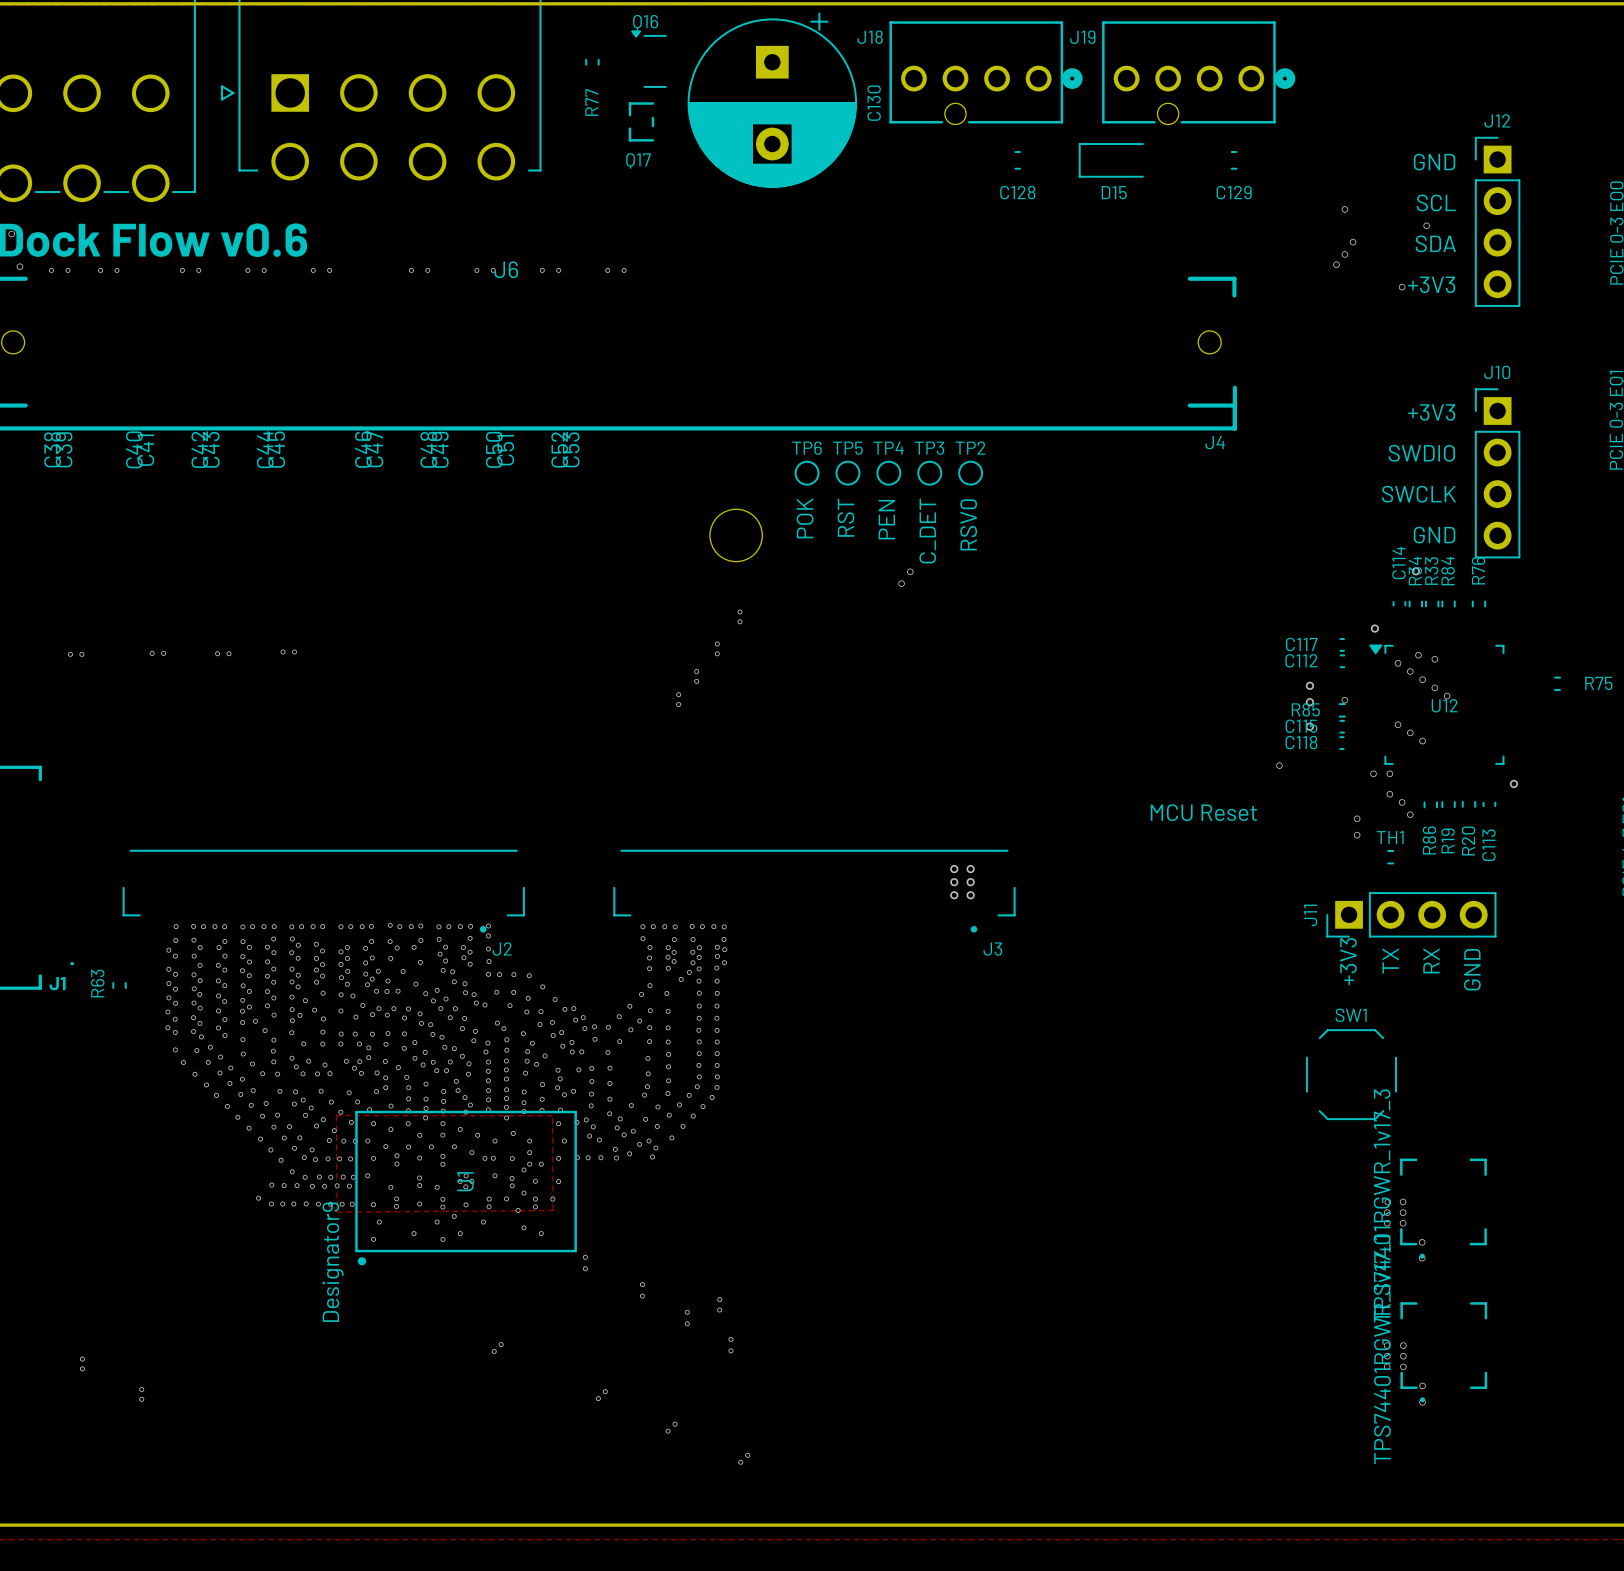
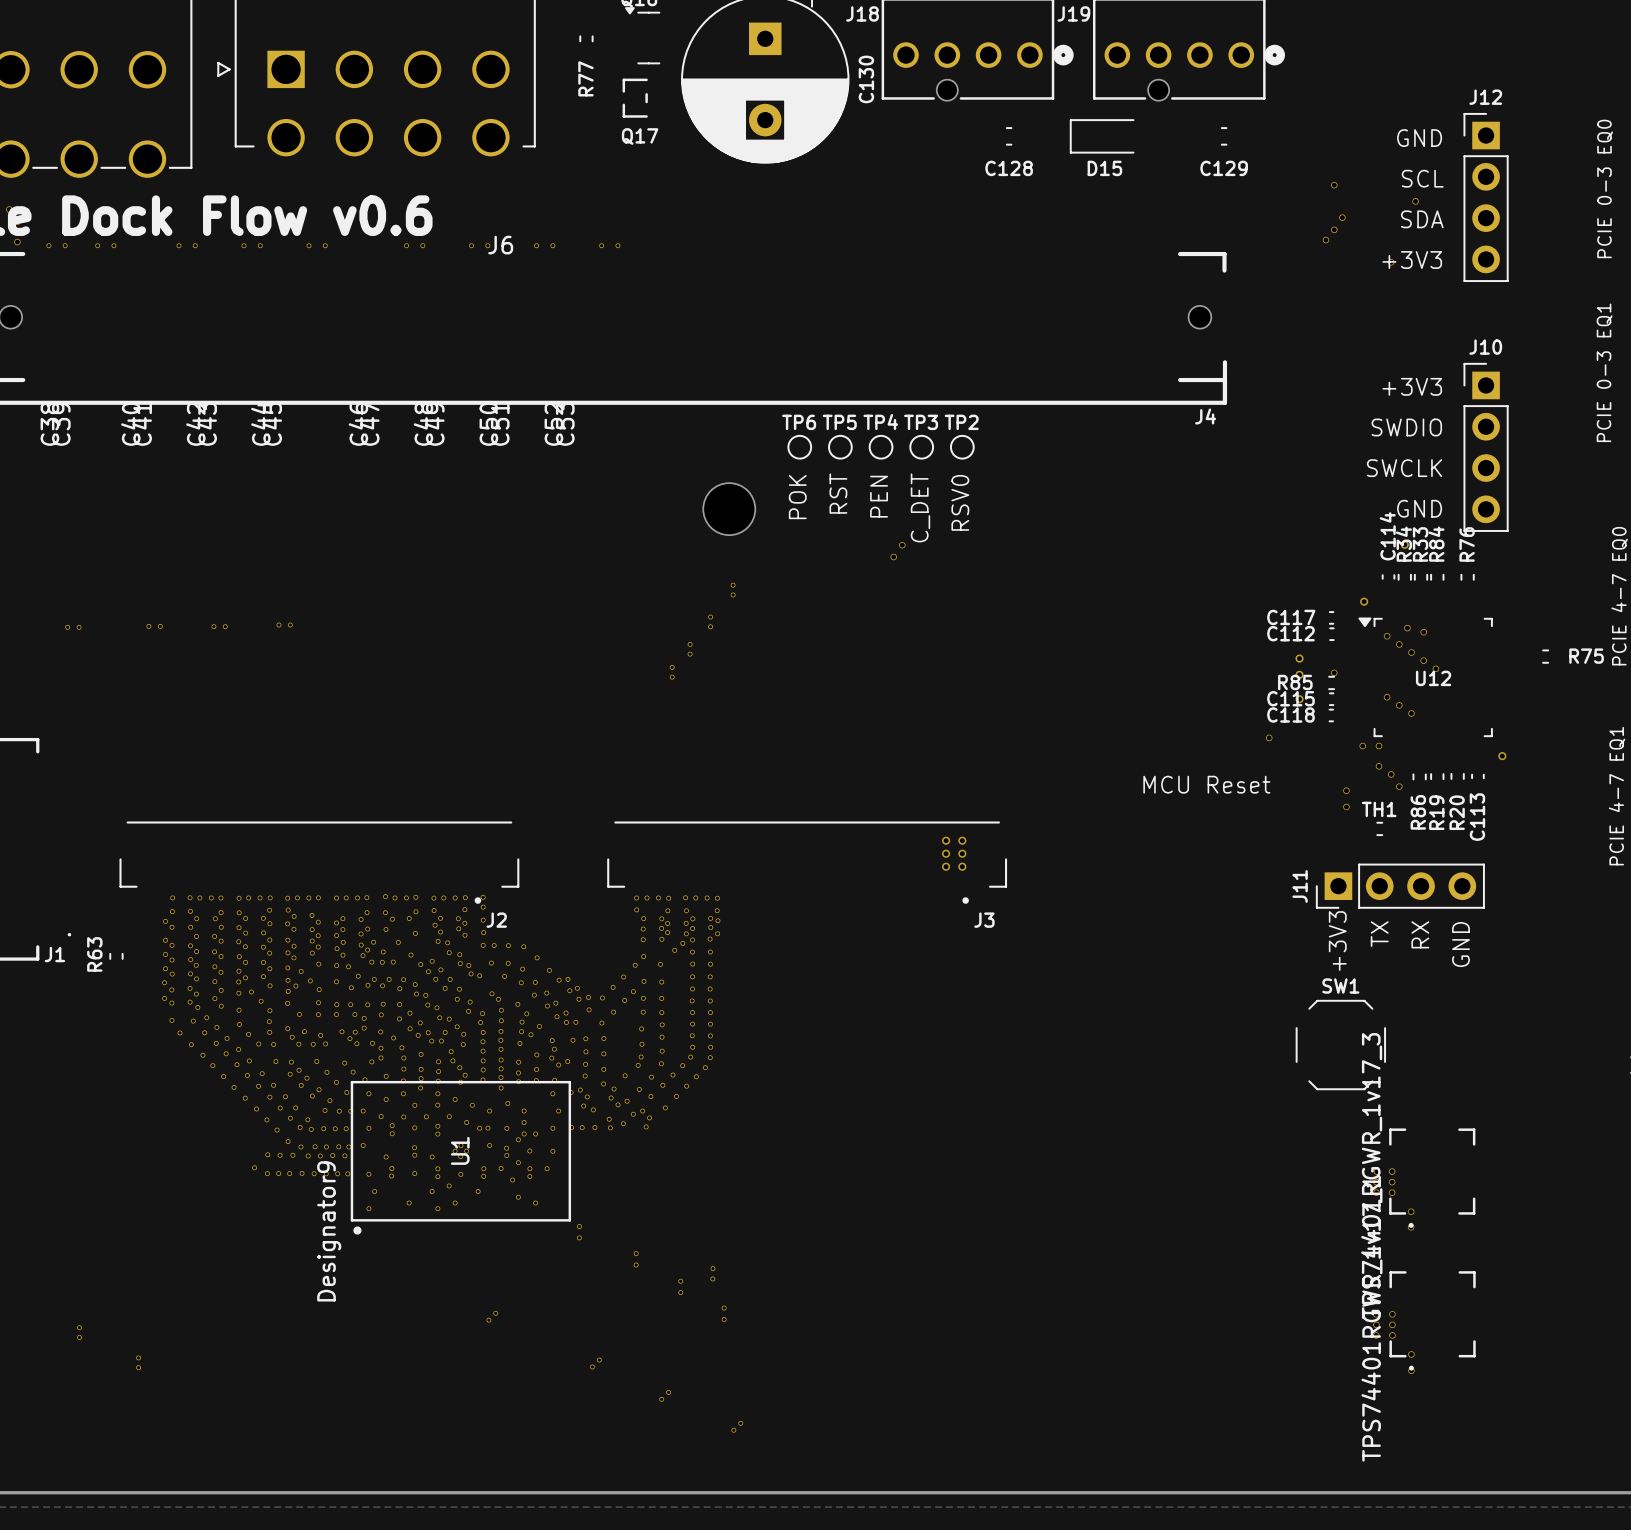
zone outline: (336, 1115) (552, 1115) (553, 1210) (337, 1212) (336, 1115) -> none

